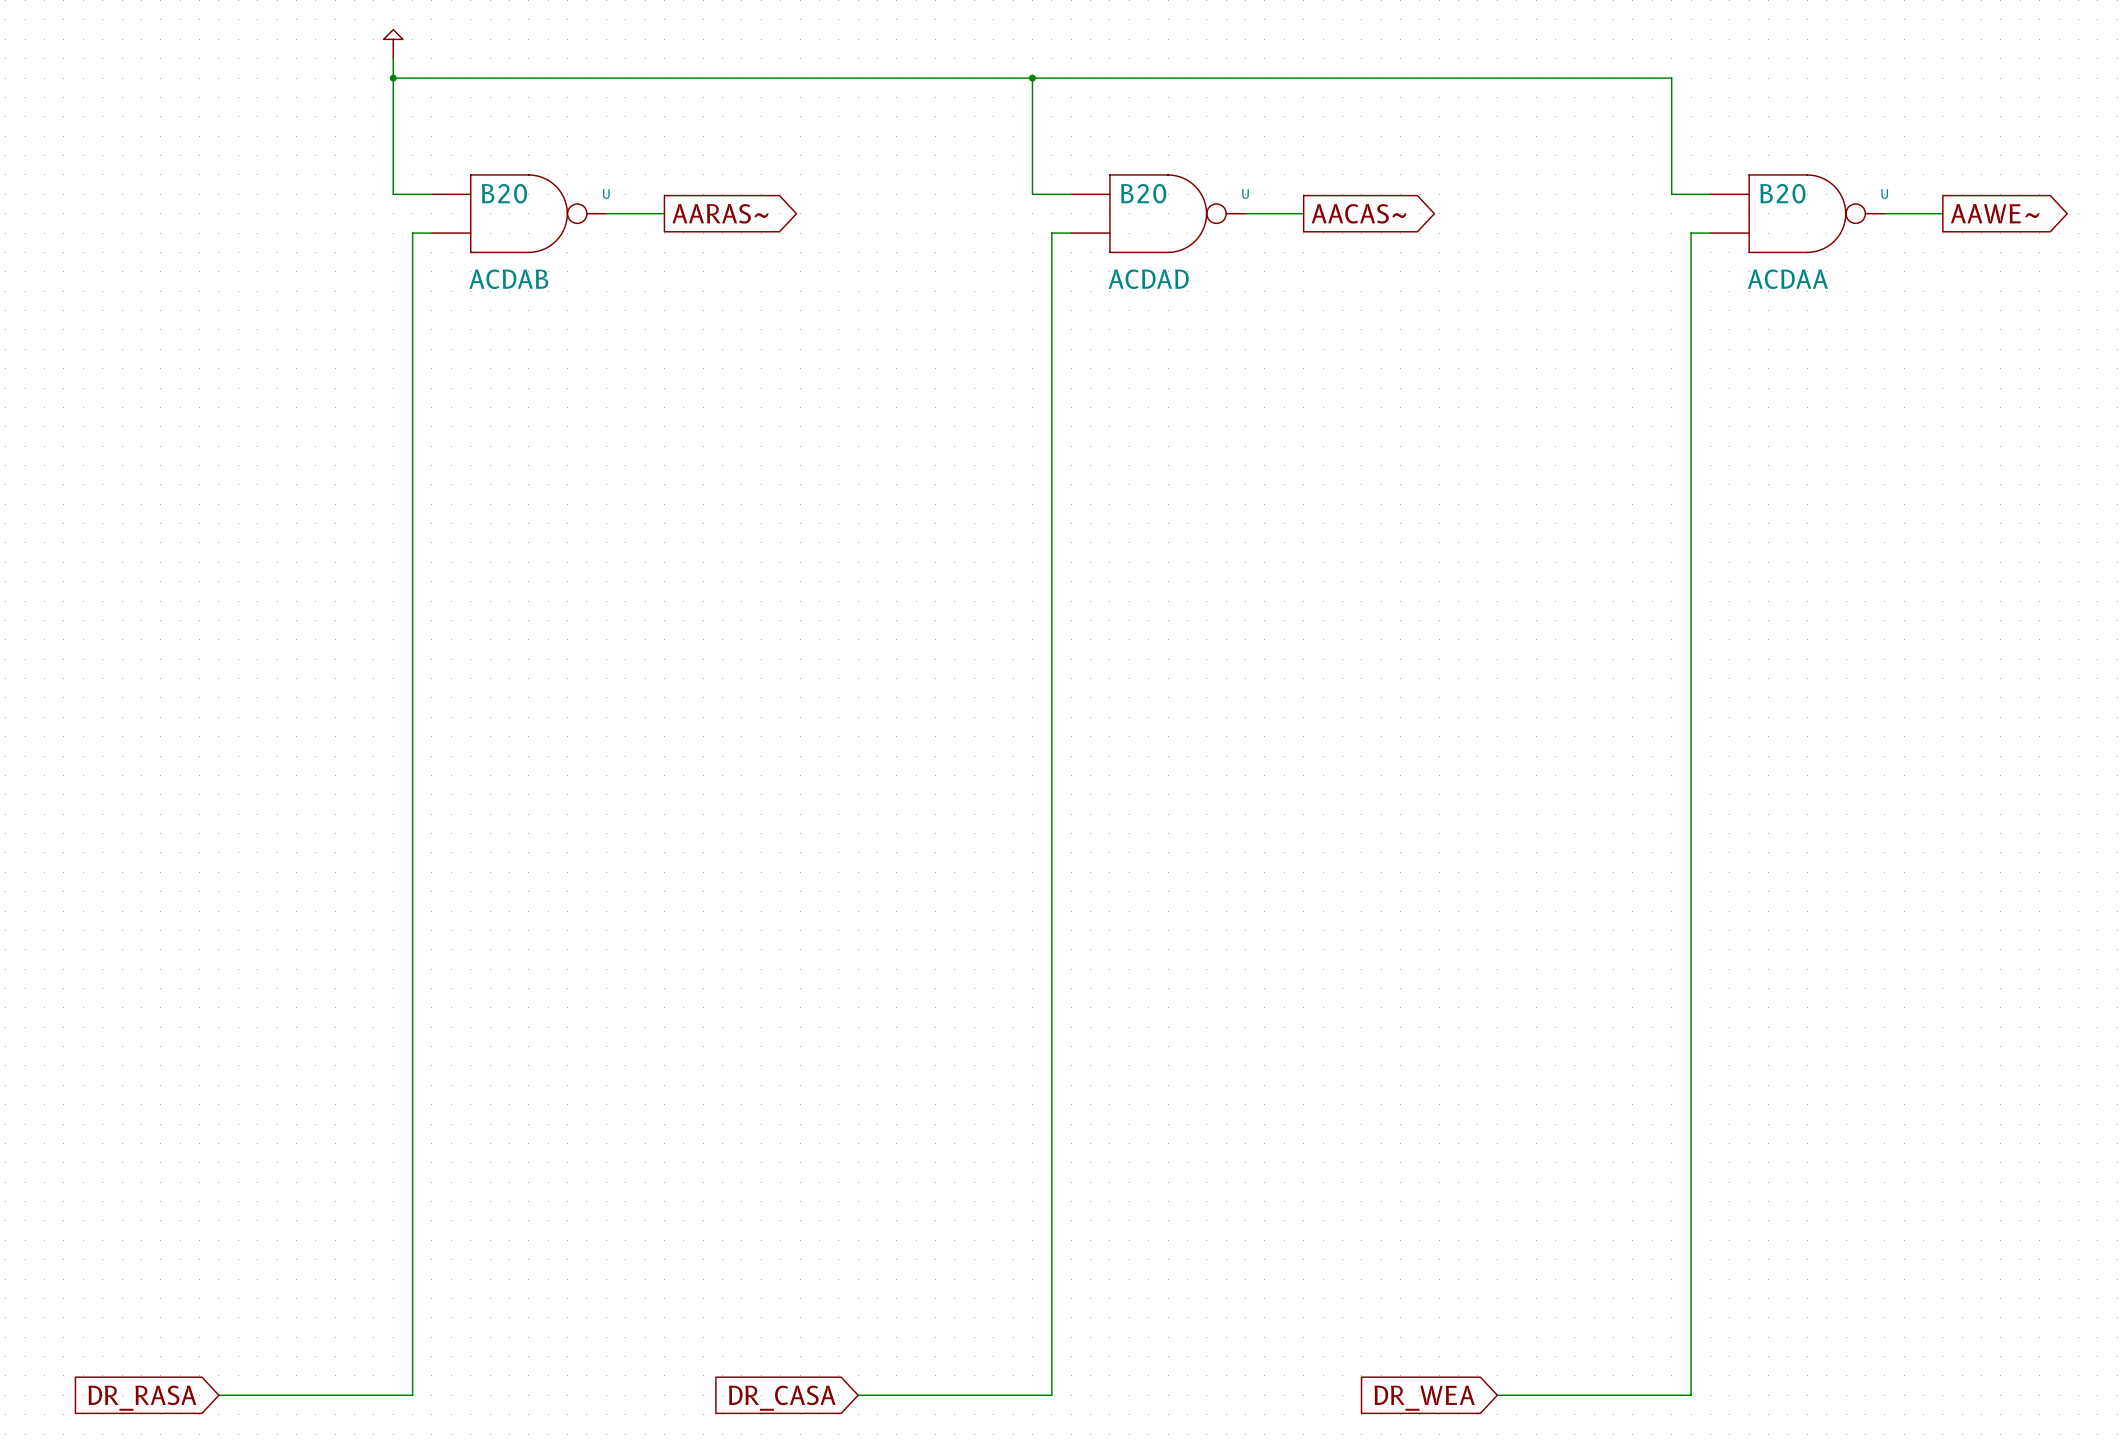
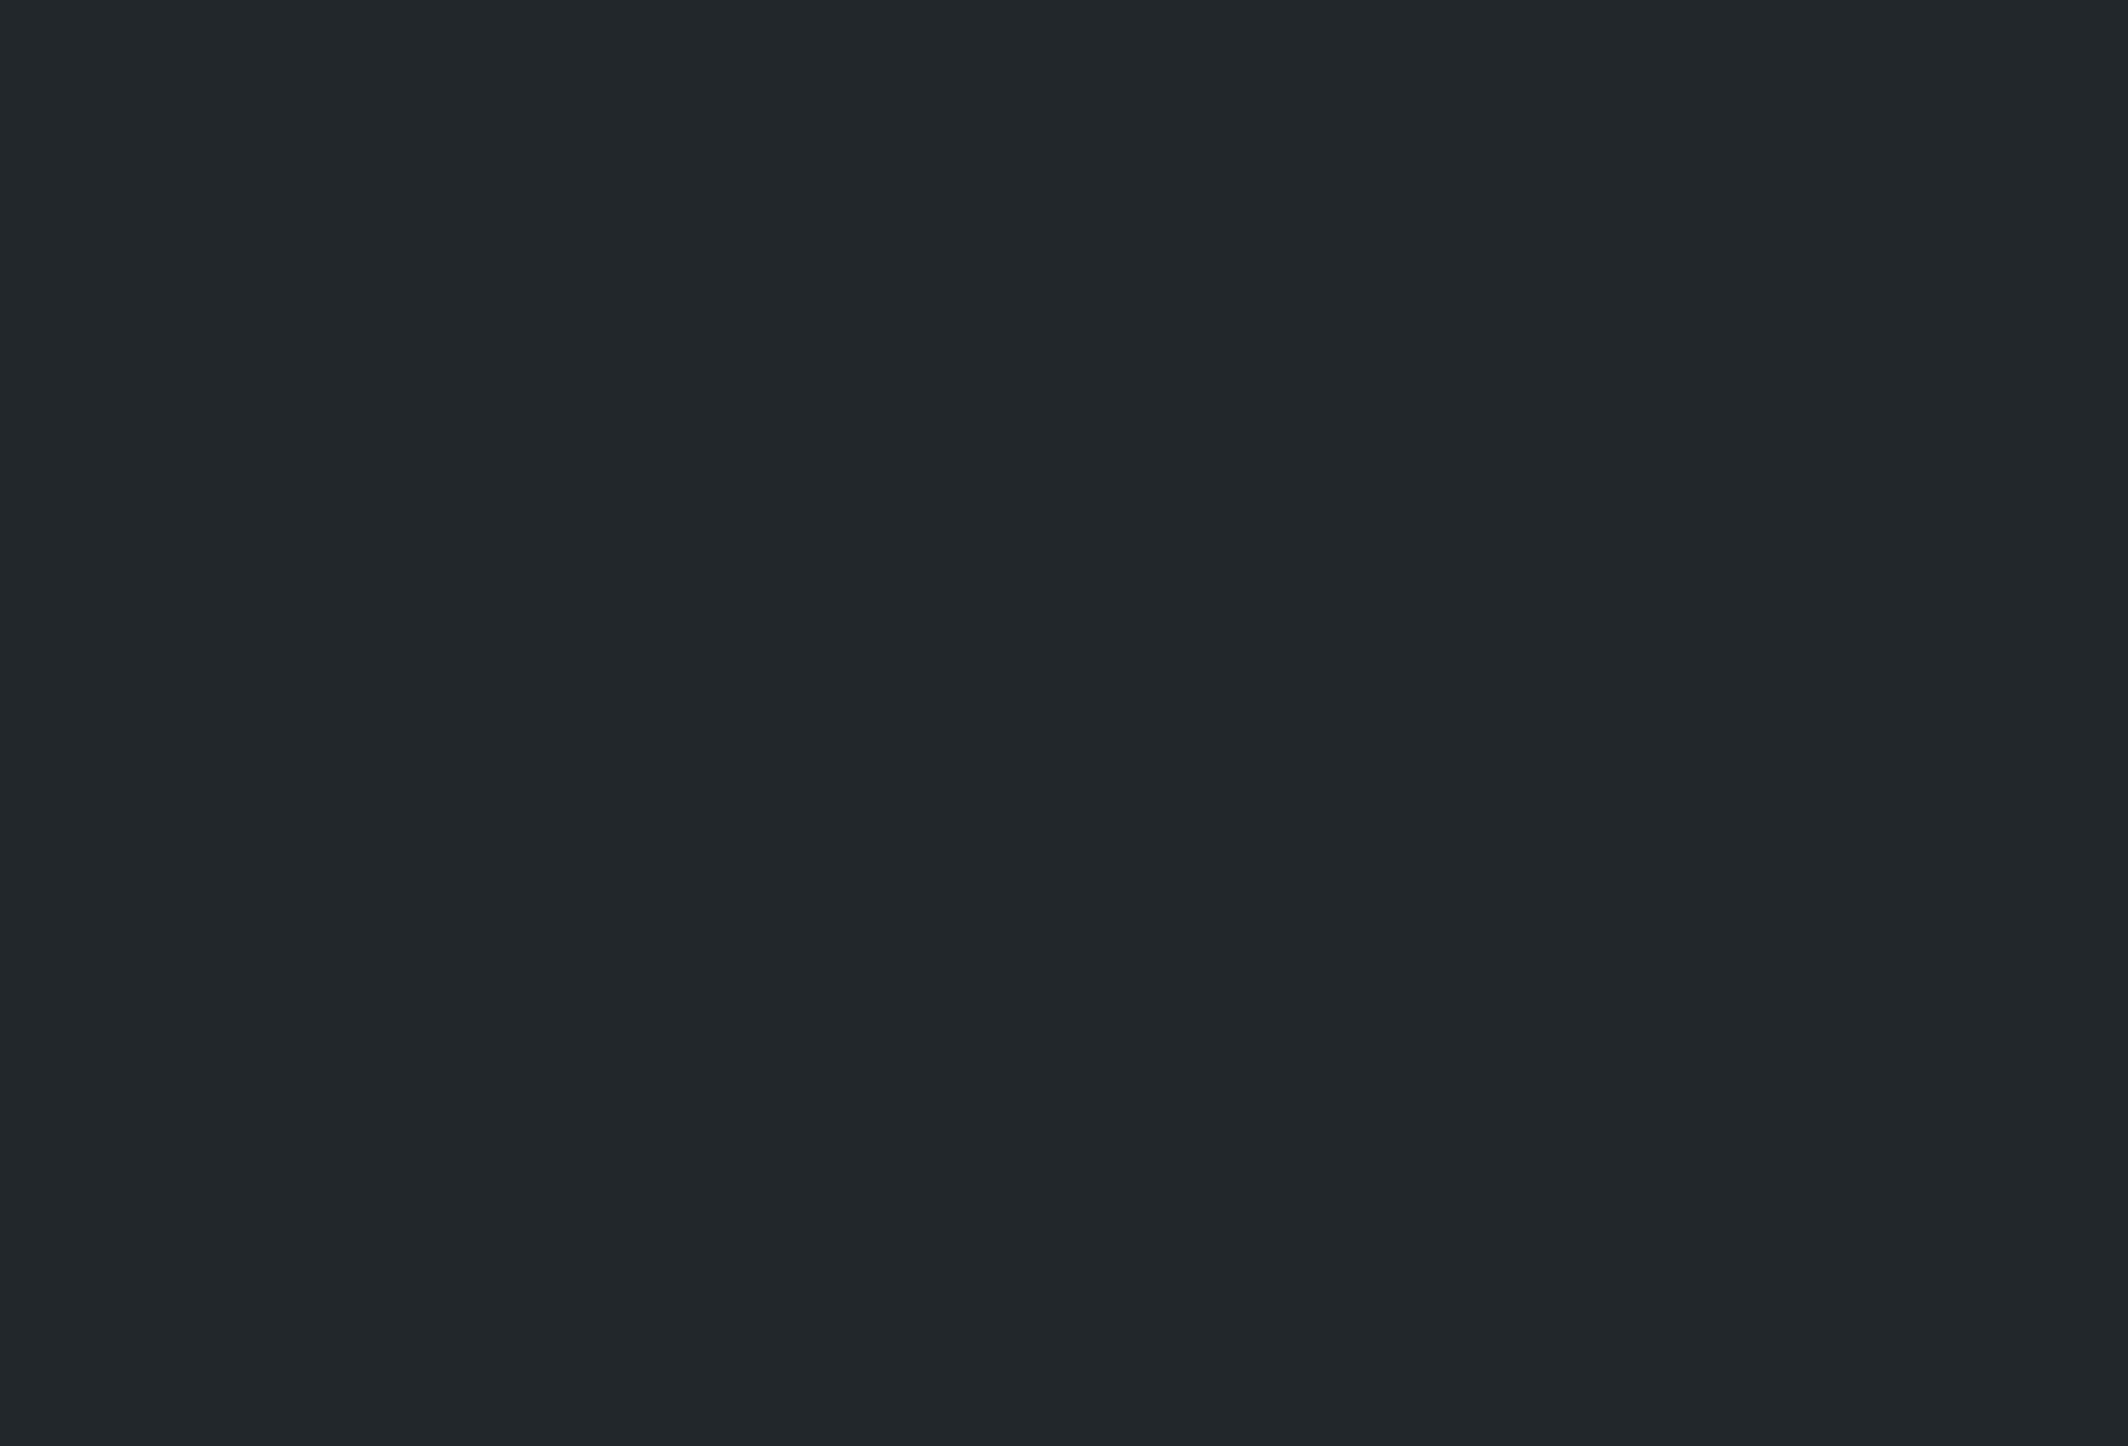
power symbol: (393, 43) -> none
wire: (393, 58) (393, 194) (431, 194) -> none
wire: (393, 78) (1671, 78) (1671, 194) (1710, 194) -> none
junction: (393, 78) -> none
wire: (1032, 78) (1032, 194) (1071, 194) -> none
junction: (1032, 78) -> none
U: (519, 213) -> none
wire: (606, 213) (664, 213) -> none
global label: AARAS~ (720, 213) -> none
U: (1158, 213) -> none
wire: (1245, 213) (1303, 213) -> none
global label: AACAS~ (1359, 213) -> none
U: (1797, 213) -> none
wire: (1884, 213) (1942, 213) -> none
global label: AAWE~ (1995, 213) -> none
wire: (431, 233) (412, 233) (412, 1395) (218, 1395) -> none
wire: (1071, 233) (1051, 233) (1051, 1395) (858, 1395) -> none
wire: (1710, 233) (1691, 233) (1691, 1395) (1497, 1395) -> none
global label: DR_RASA (142, 1398) -> none
global label: DR_CASA (782, 1398) -> none
global label: DR_WEA (1424, 1398) -> none

